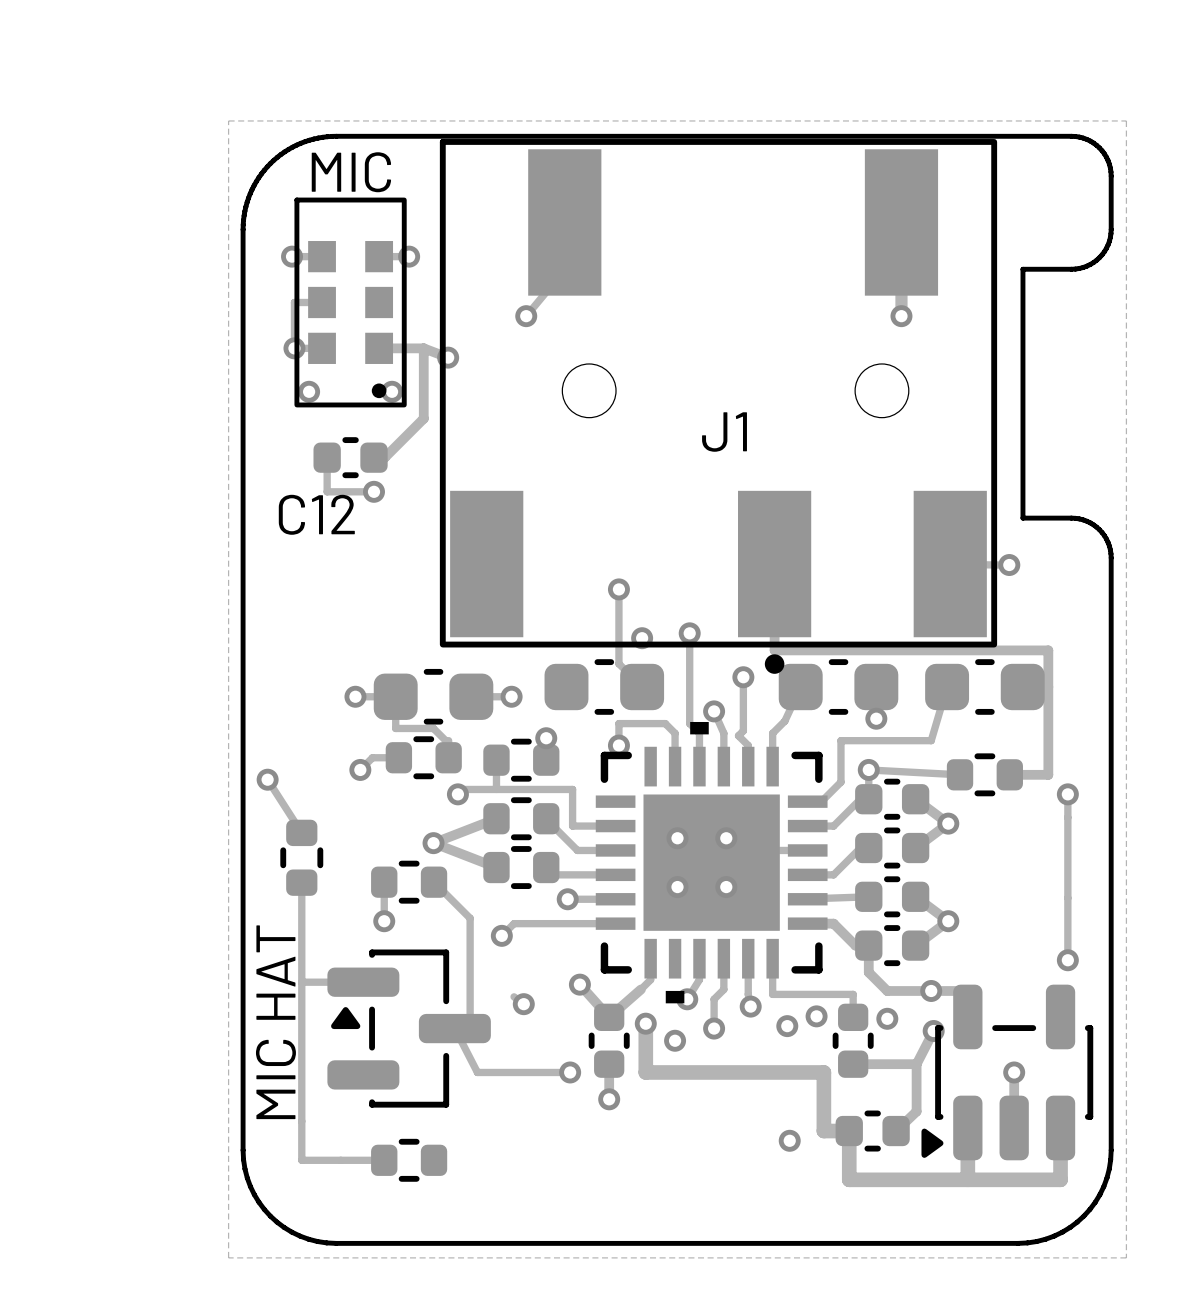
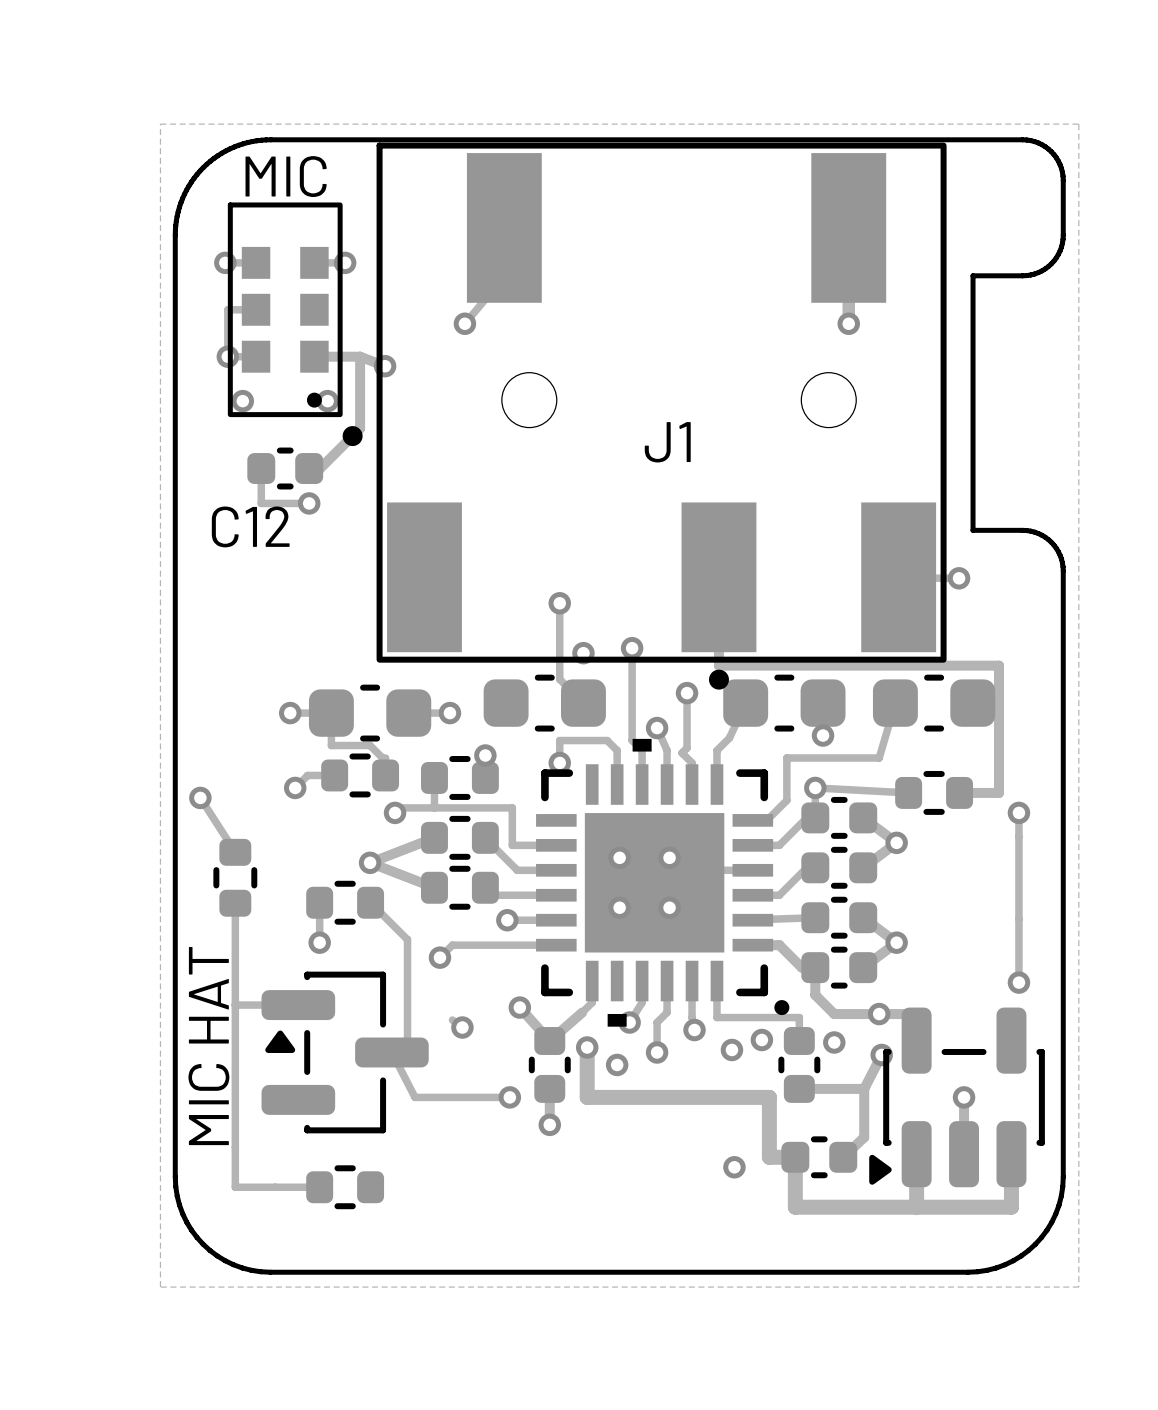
drawing: none -> [342, 426, 363, 447]
drawing: none -> [774, 1000, 790, 1016]

